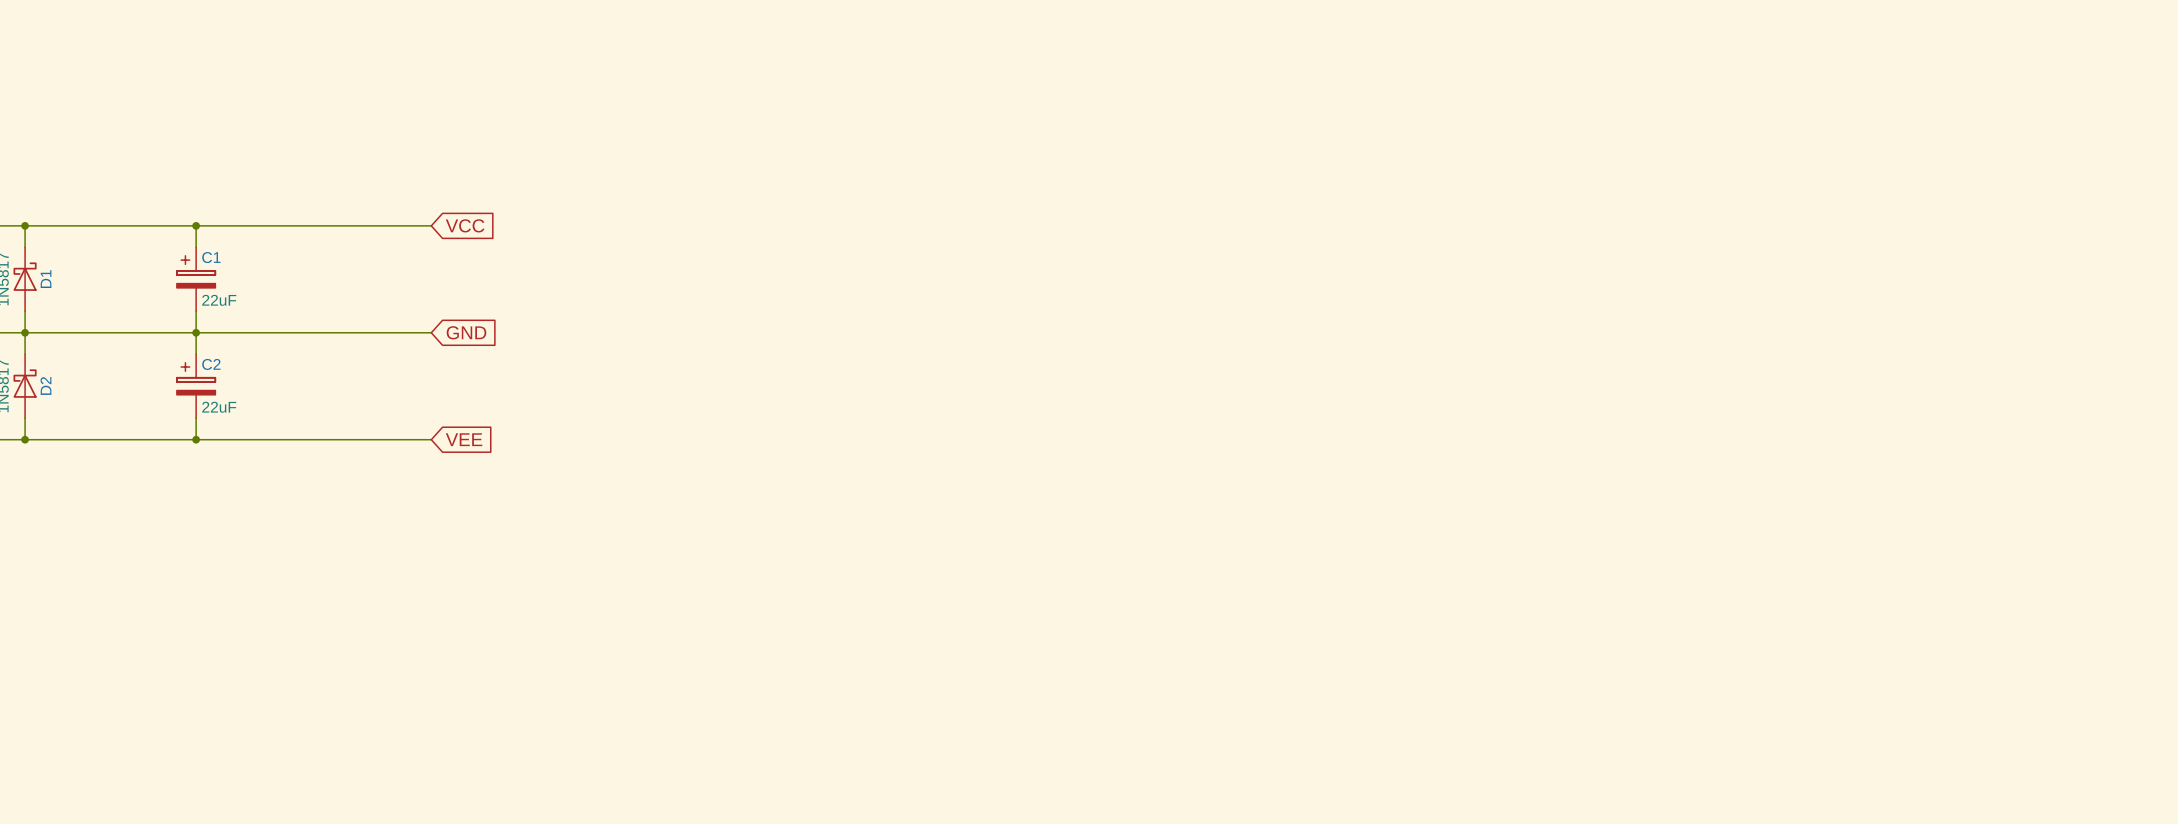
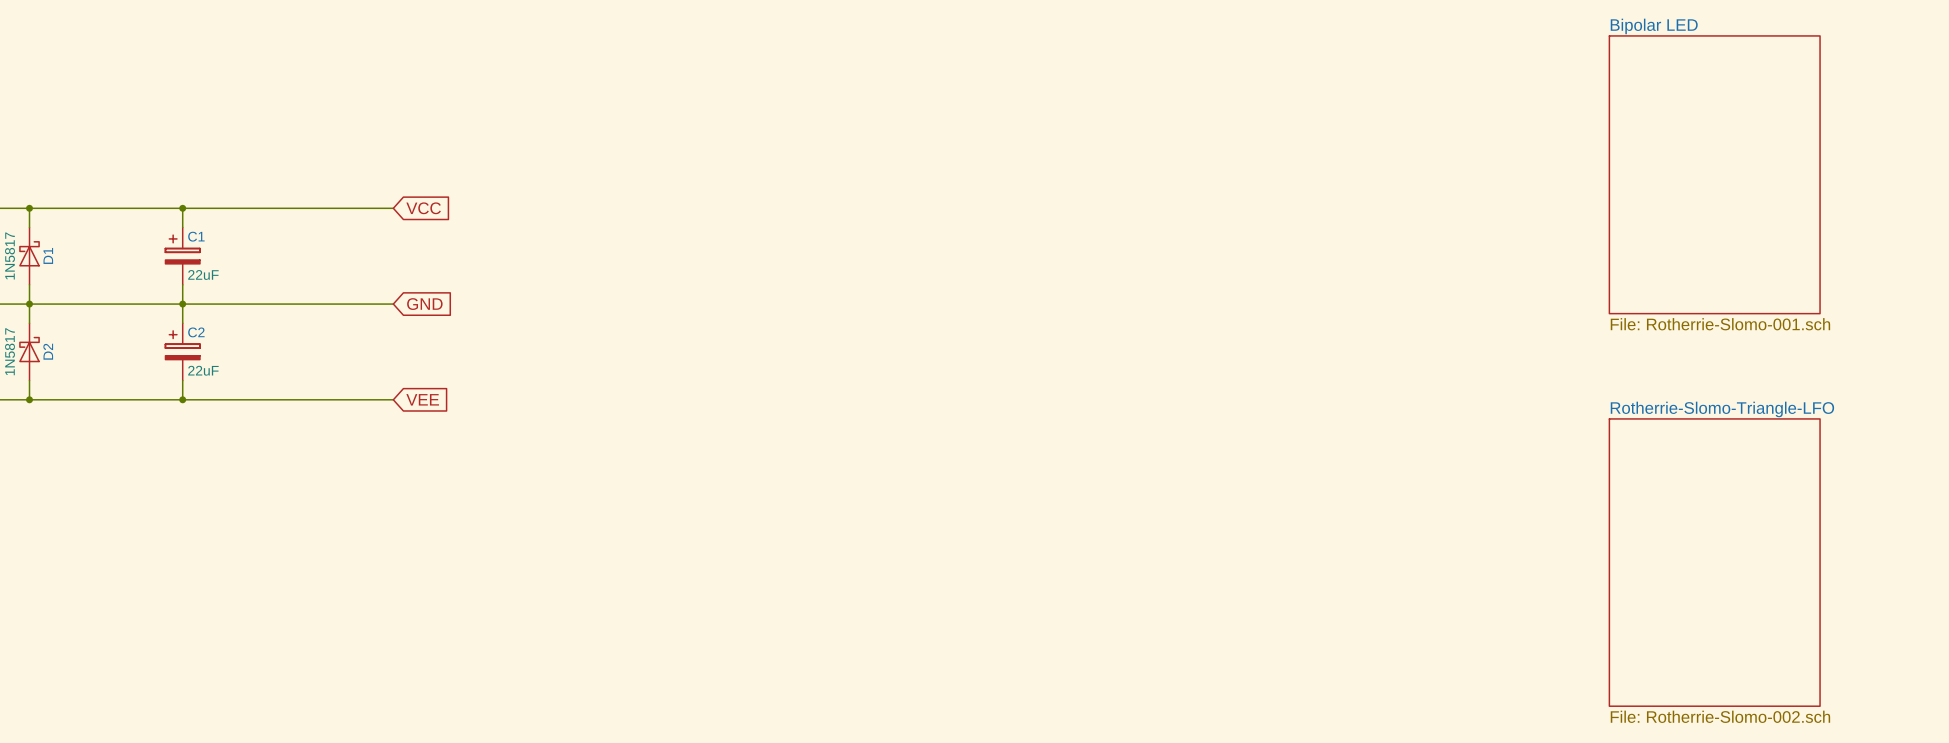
sheet Bipolar LED: none -> File: Rotherrie-Slomo-001.sch (1714, 174)
sheet Rotherrie-Slomo-Triangle-LFO: none -> File: Rotherrie-Slomo-002.sch (1714, 562)

